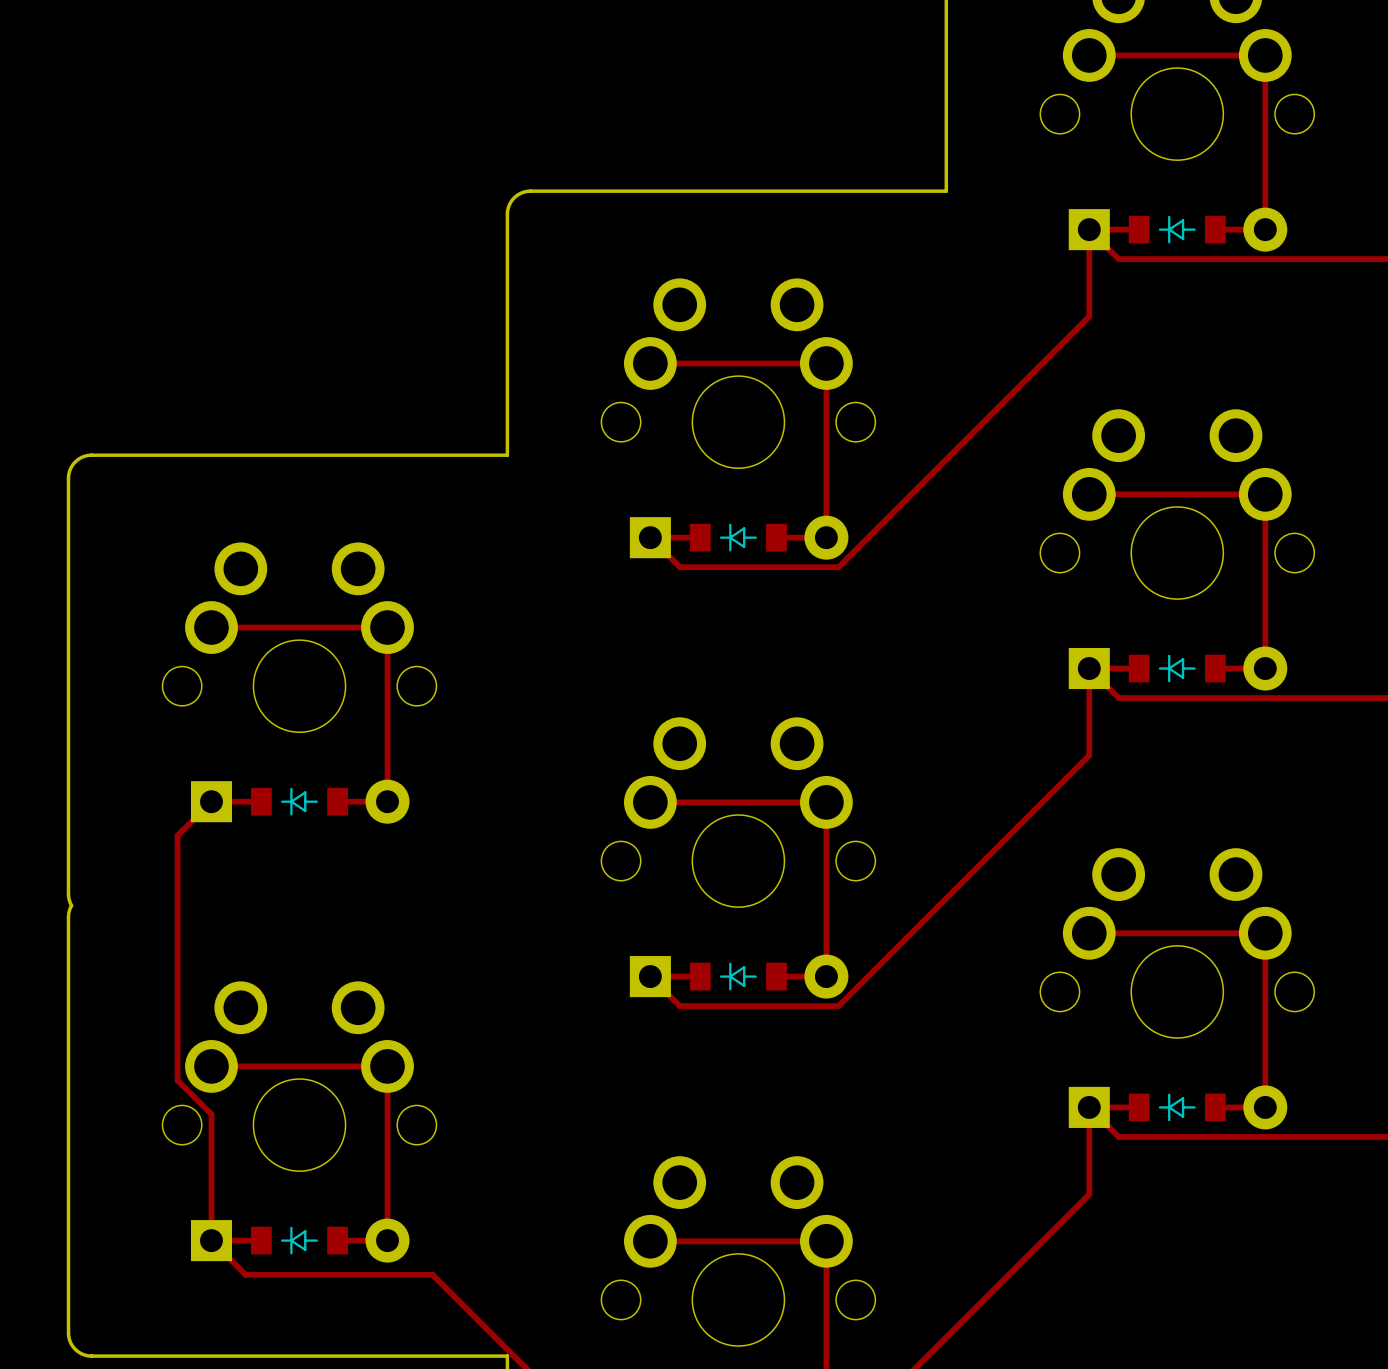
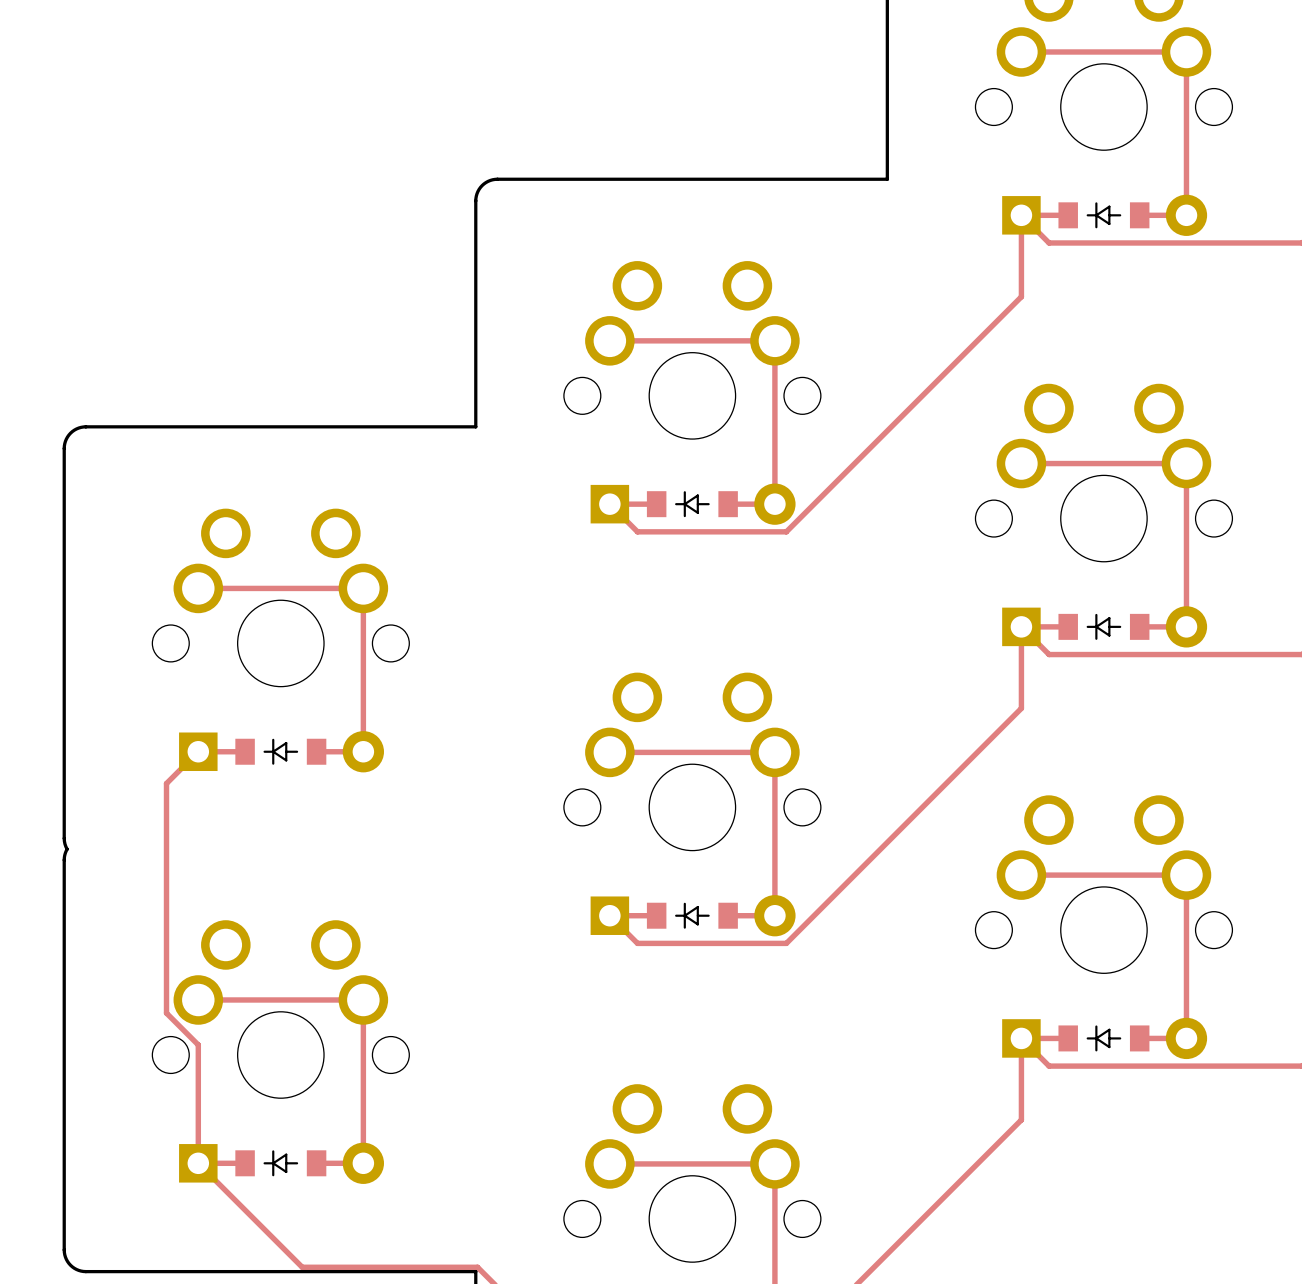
track: (245, 1274) (432, 1274) (509, 1351) -> (230, 1195) (302, 1267) (477, 1267)

